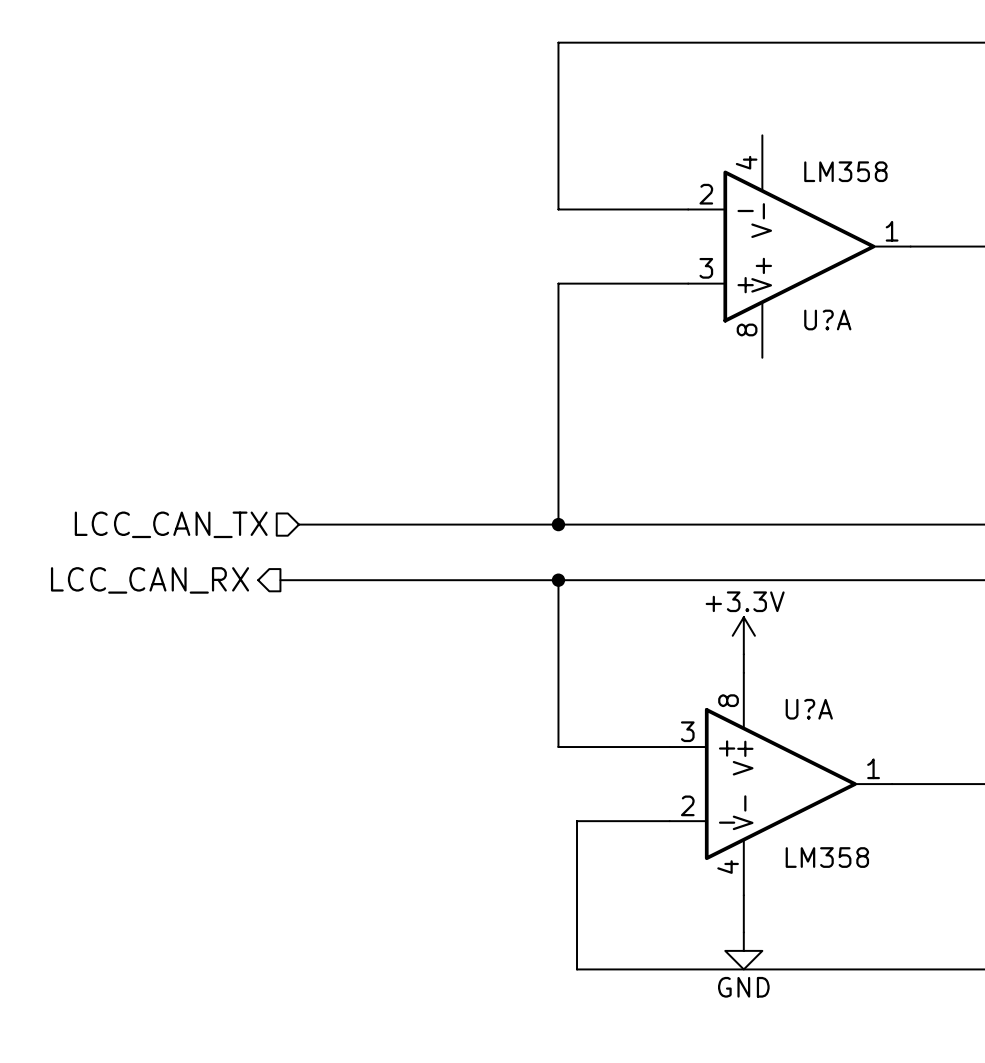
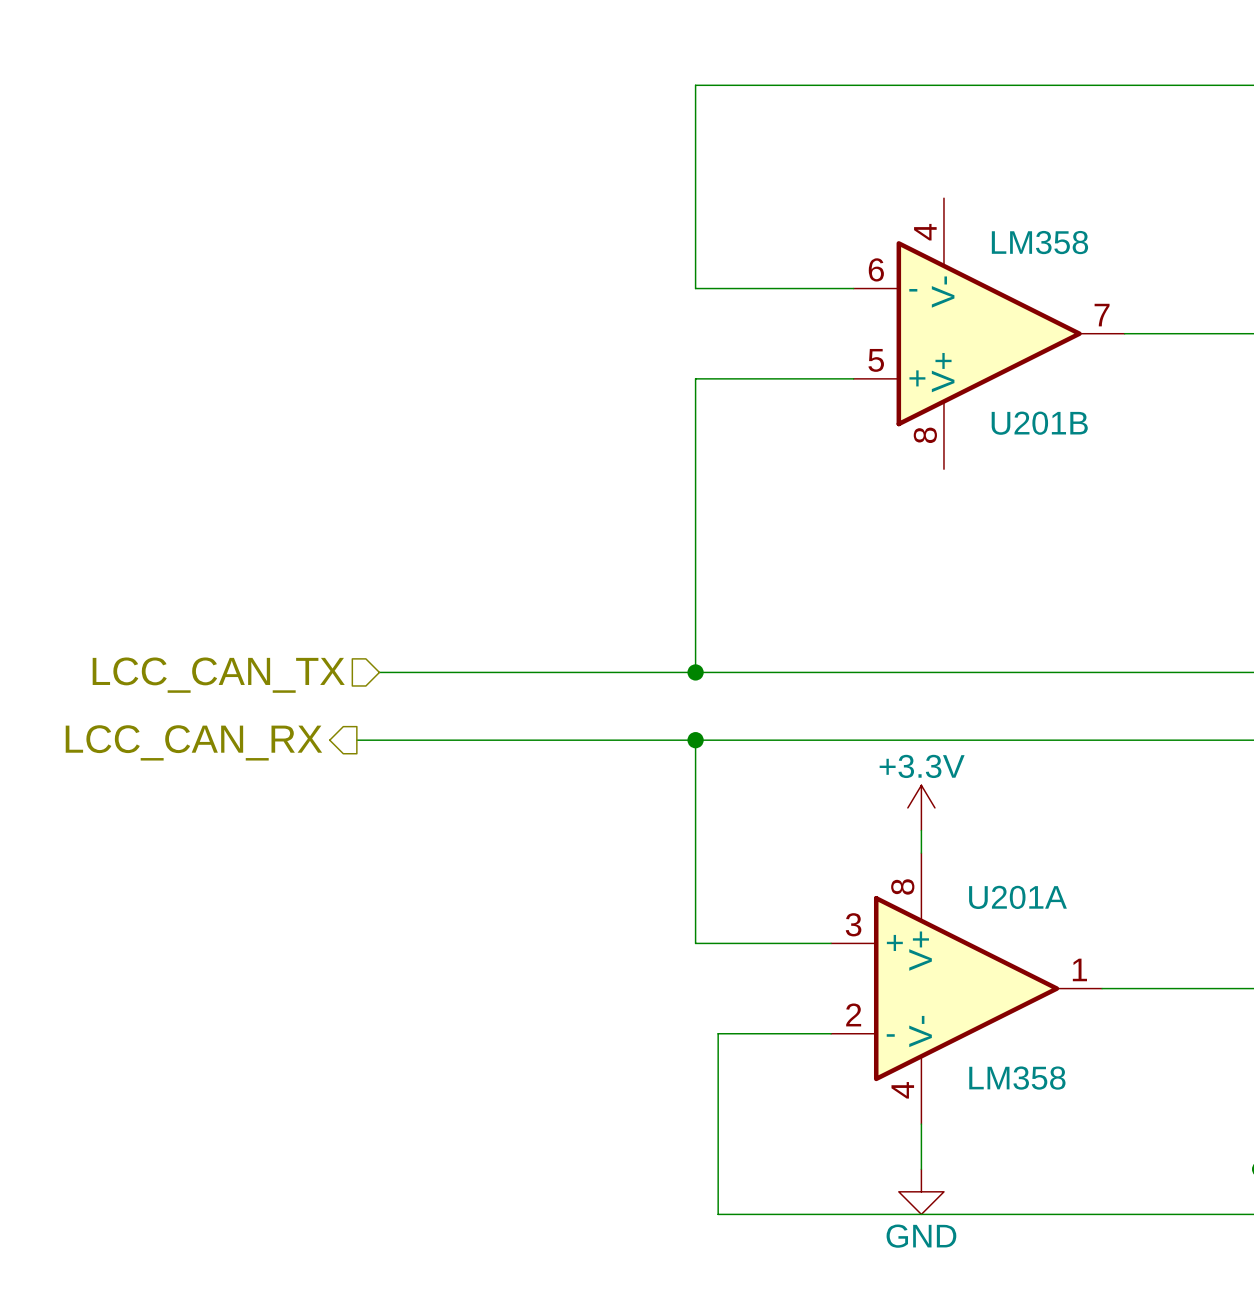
U?A pin number: 2 (706, 194) -> 6 (876, 269)
U?A pin number: 1 (892, 231) -> 7 (1102, 315)
U?A pin number: 3 (706, 268) -> 5 (876, 360)
U?A name: U?A (827, 320) -> U201B (1039, 423)
U?A name: U?A (809, 709) -> U201A (1017, 897)

